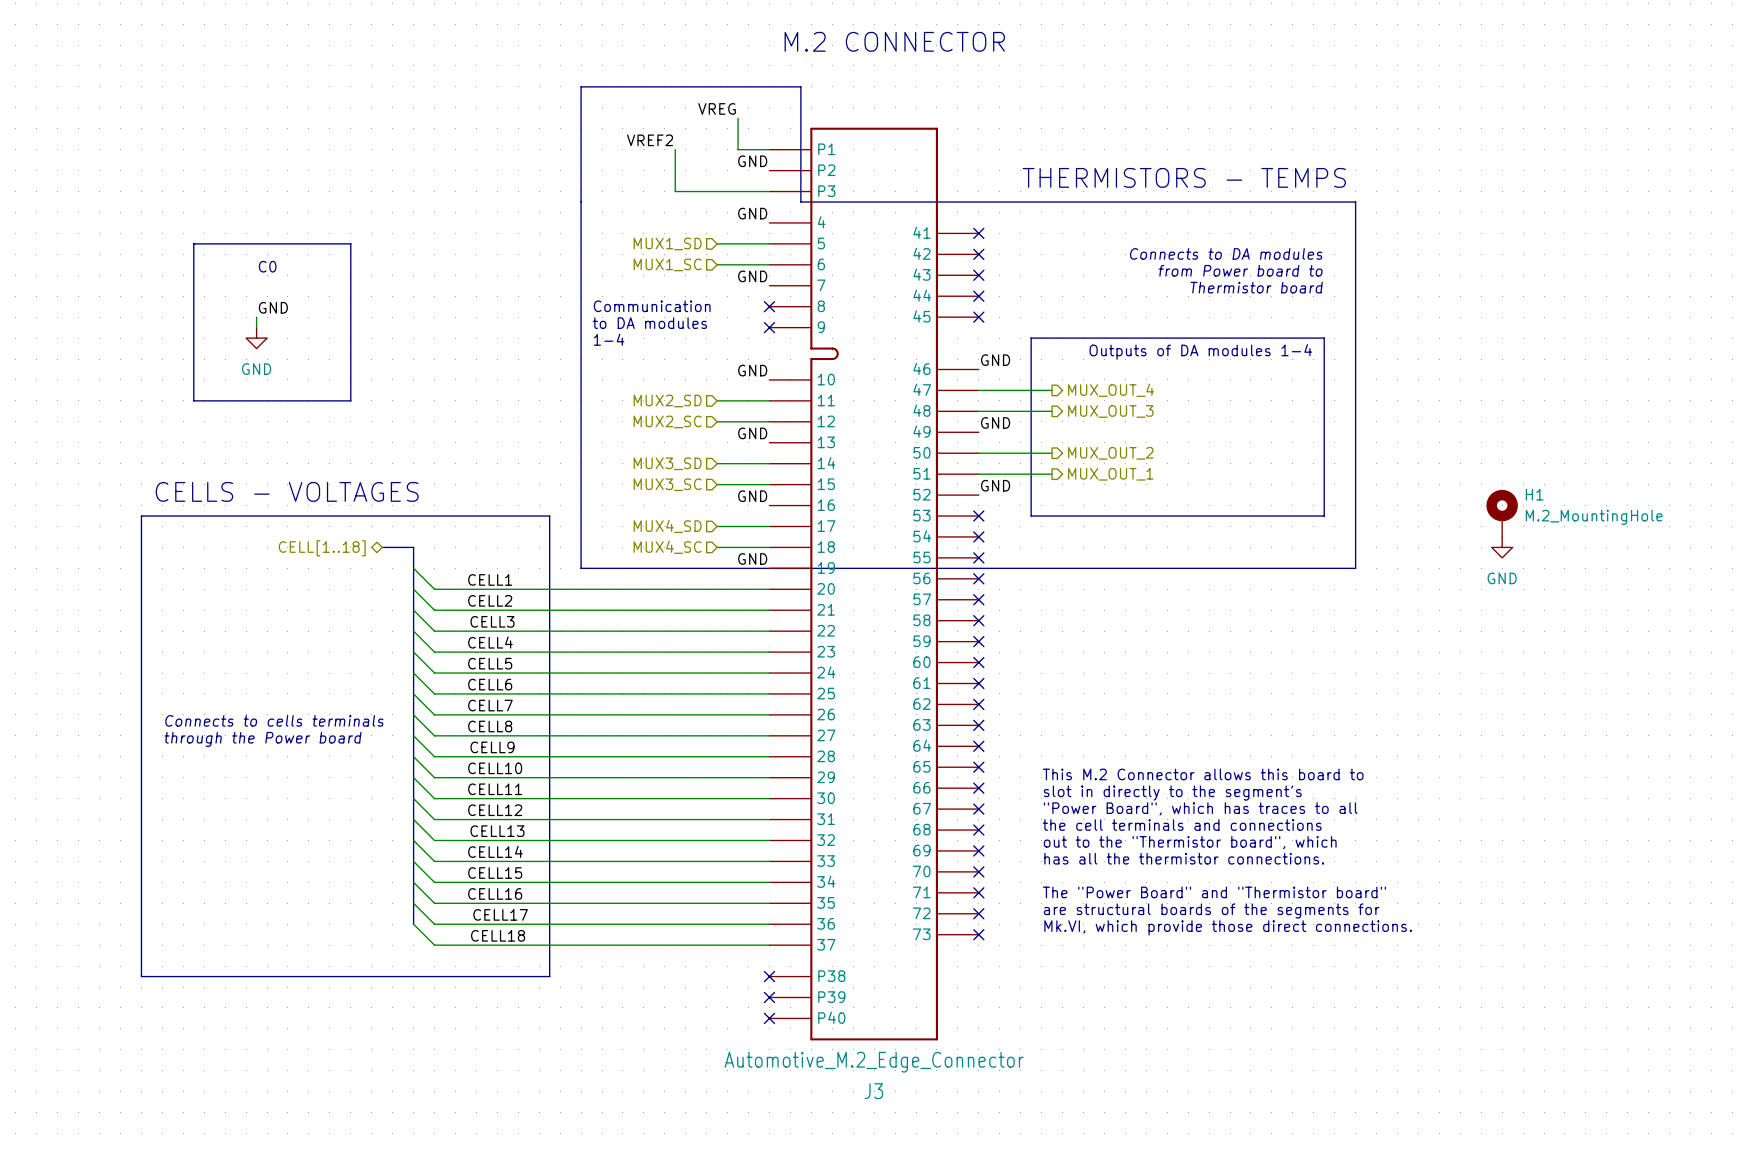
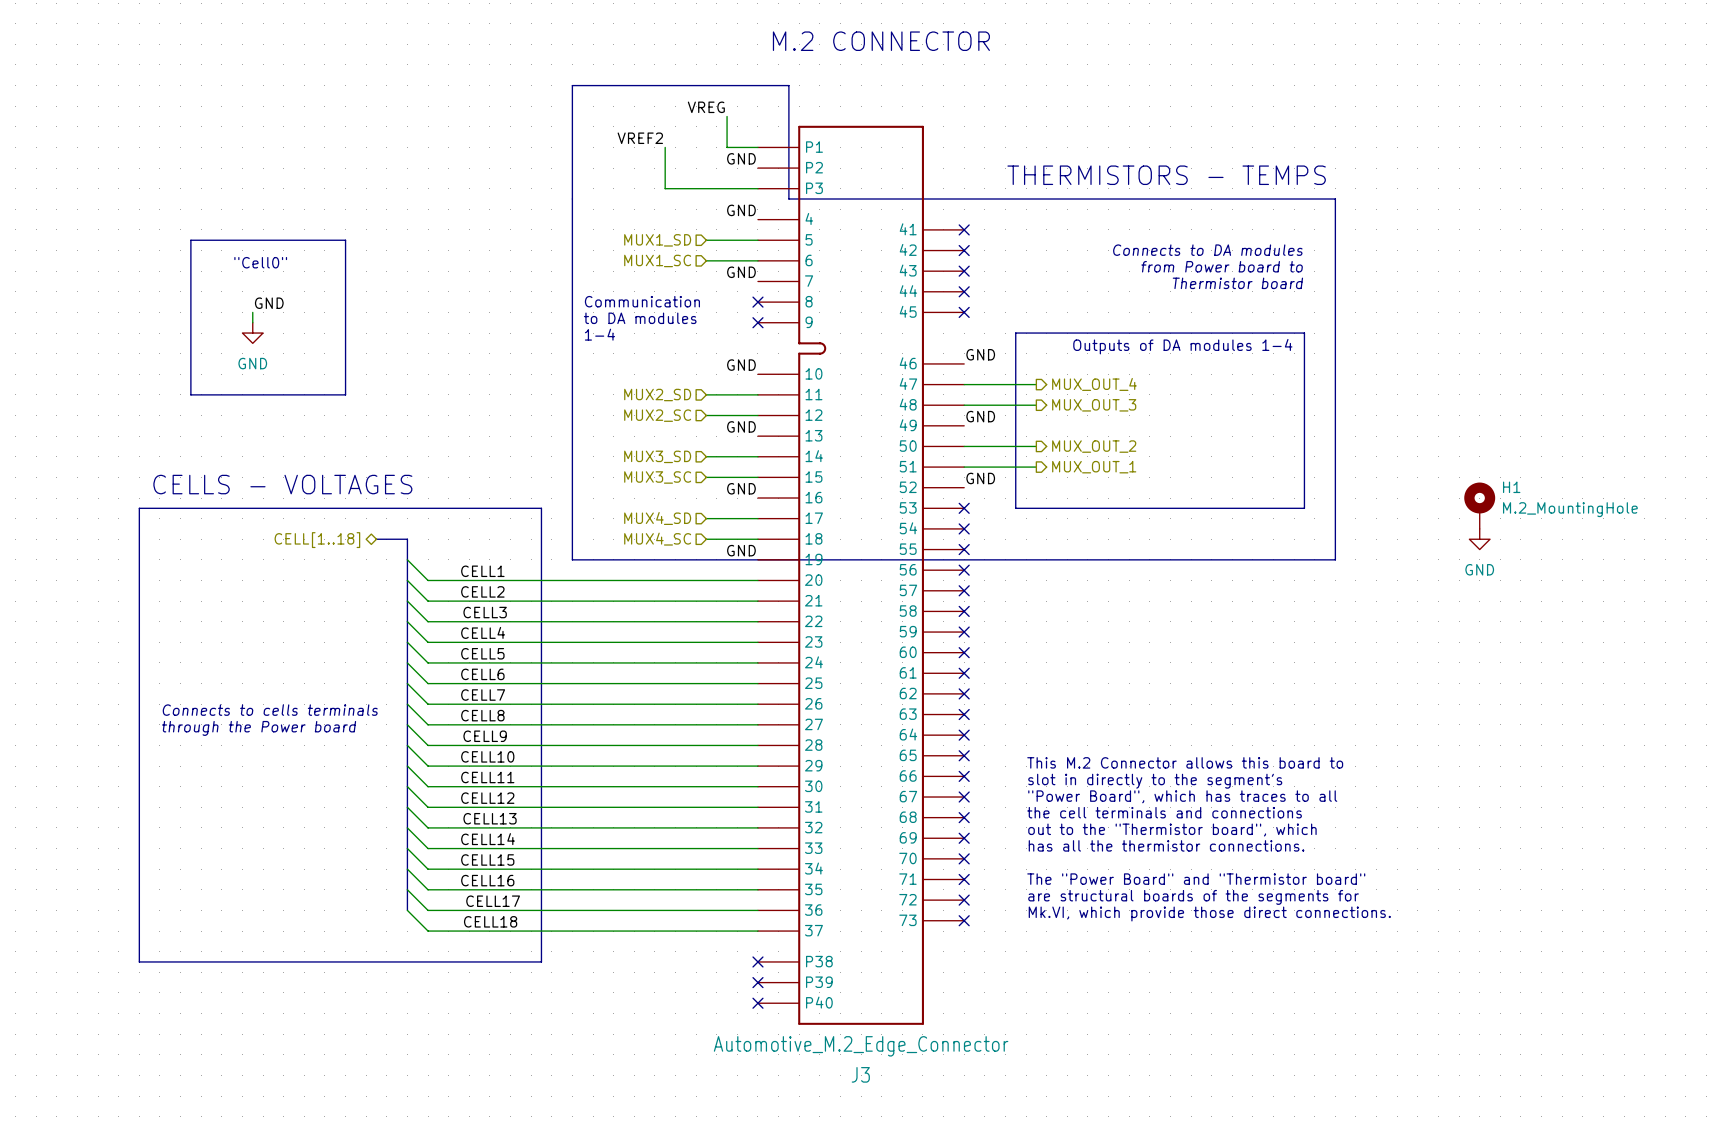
text: none -> "Cell0" (260, 262)
text: C0 (267, 266) -> none

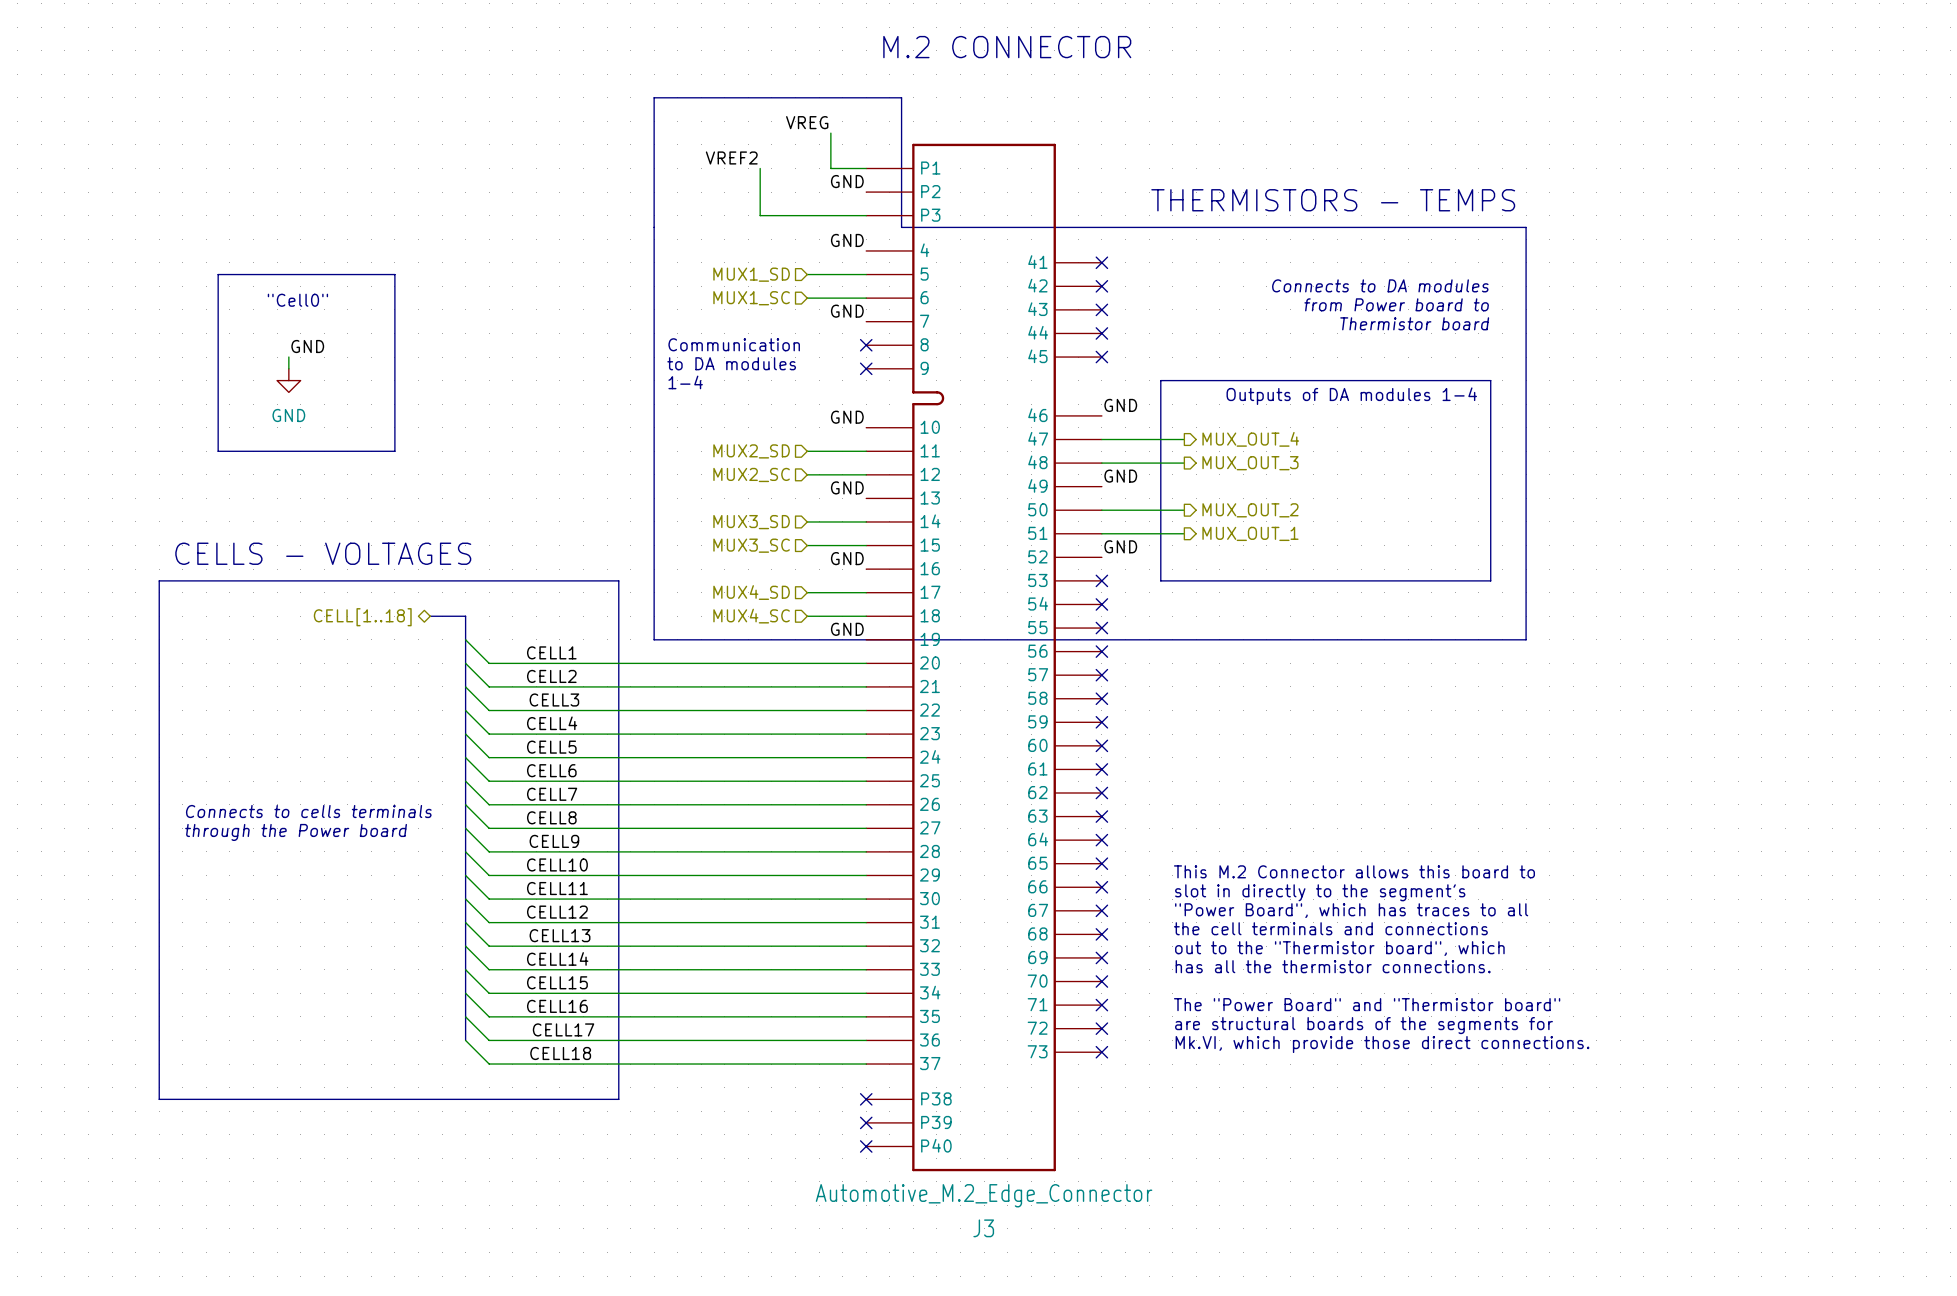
H1: M.2_MountingHole (1479, 505) -> none
power symbol: GND (1479, 539) -> none

